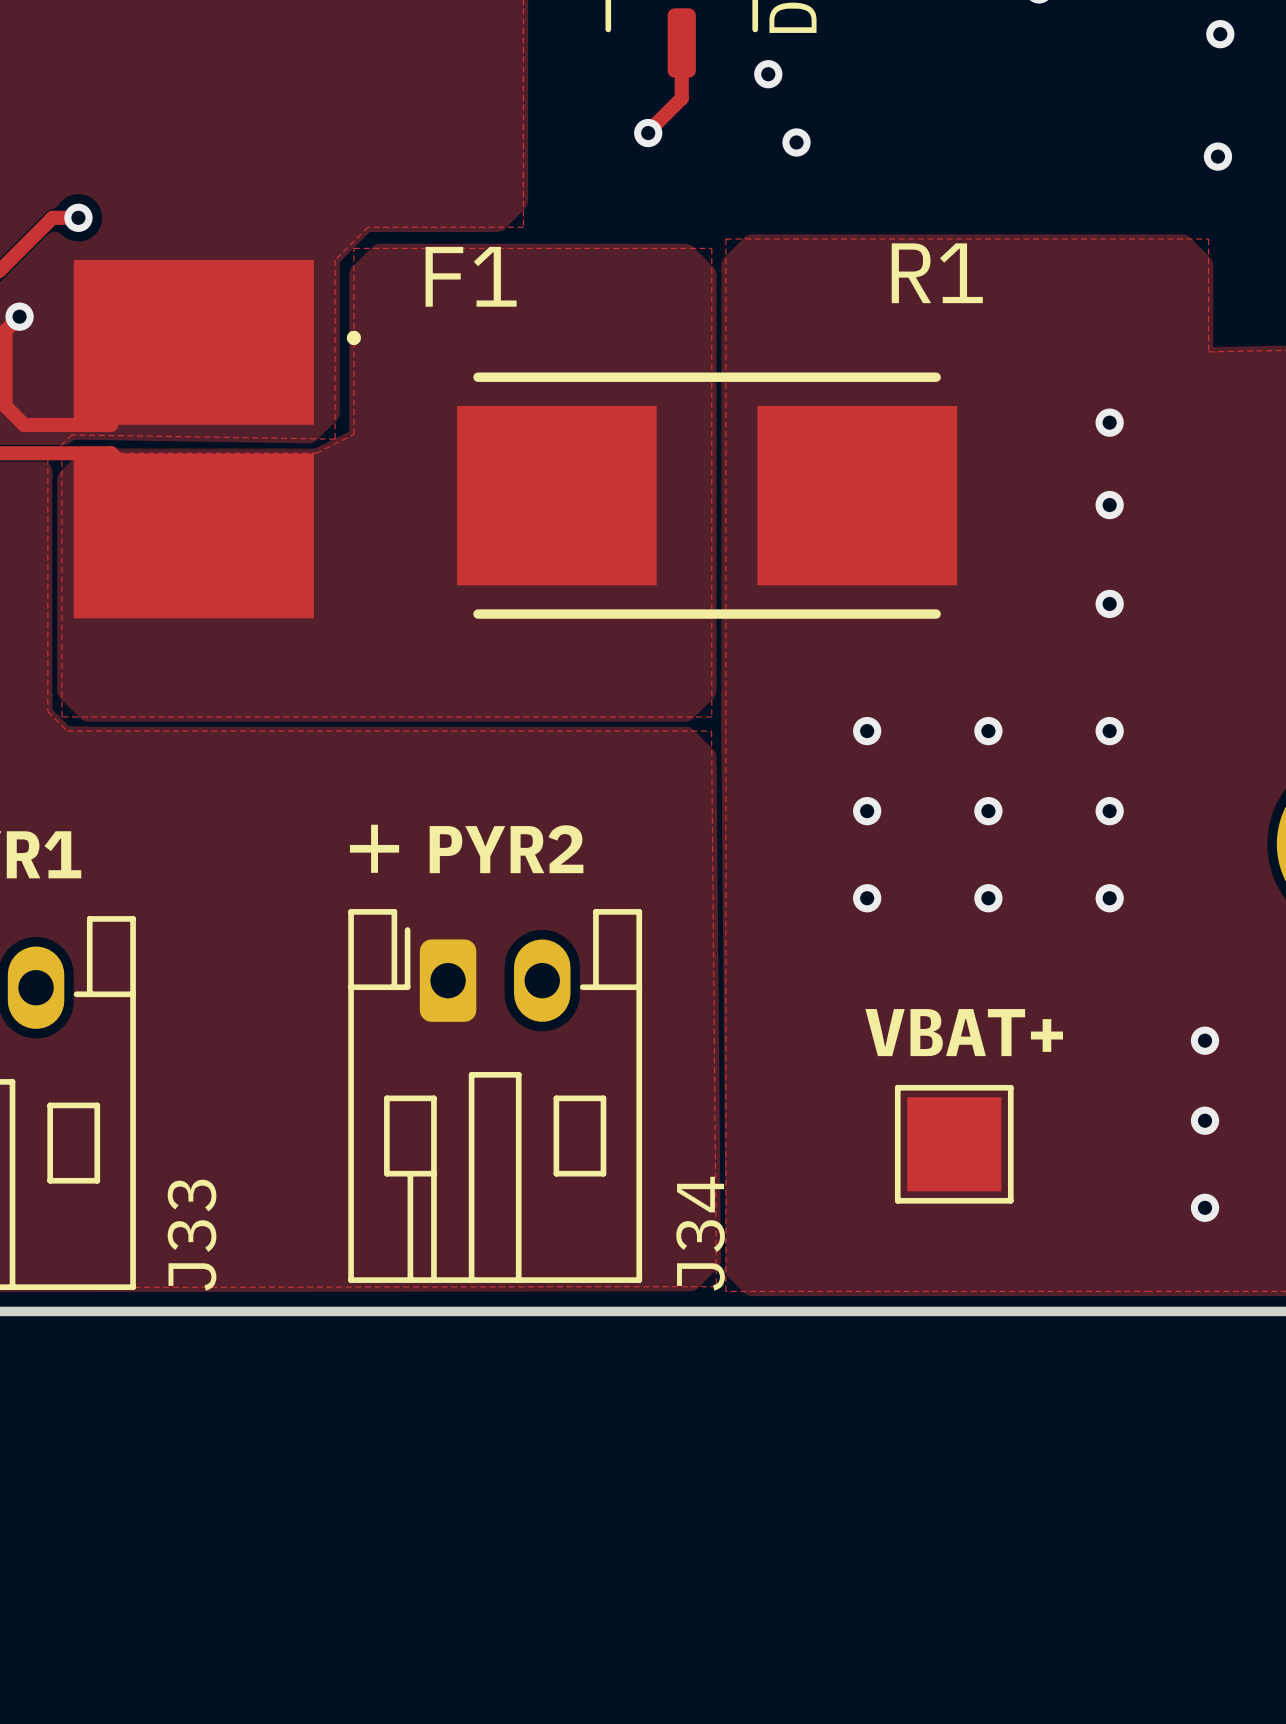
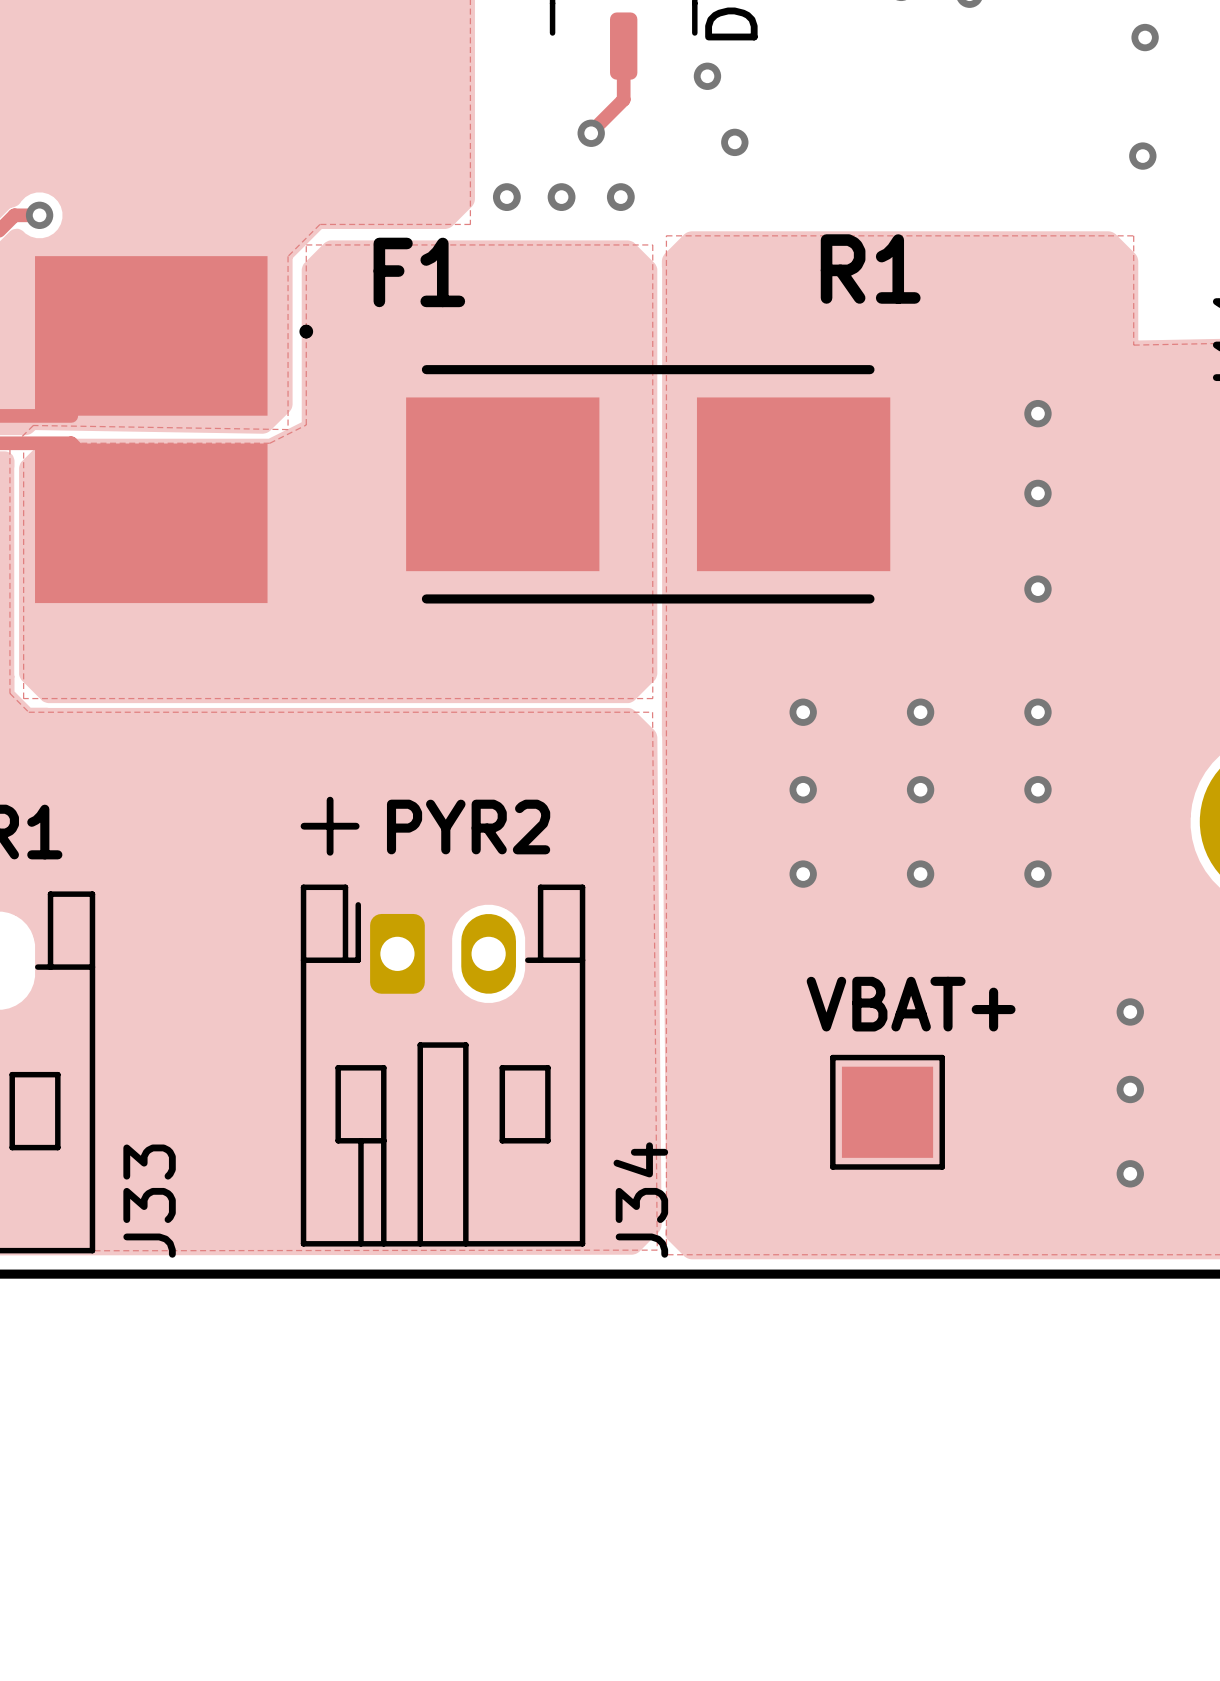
via: none -> (506, 197)
via: none -> (561, 197)
via: none -> (620, 197)

